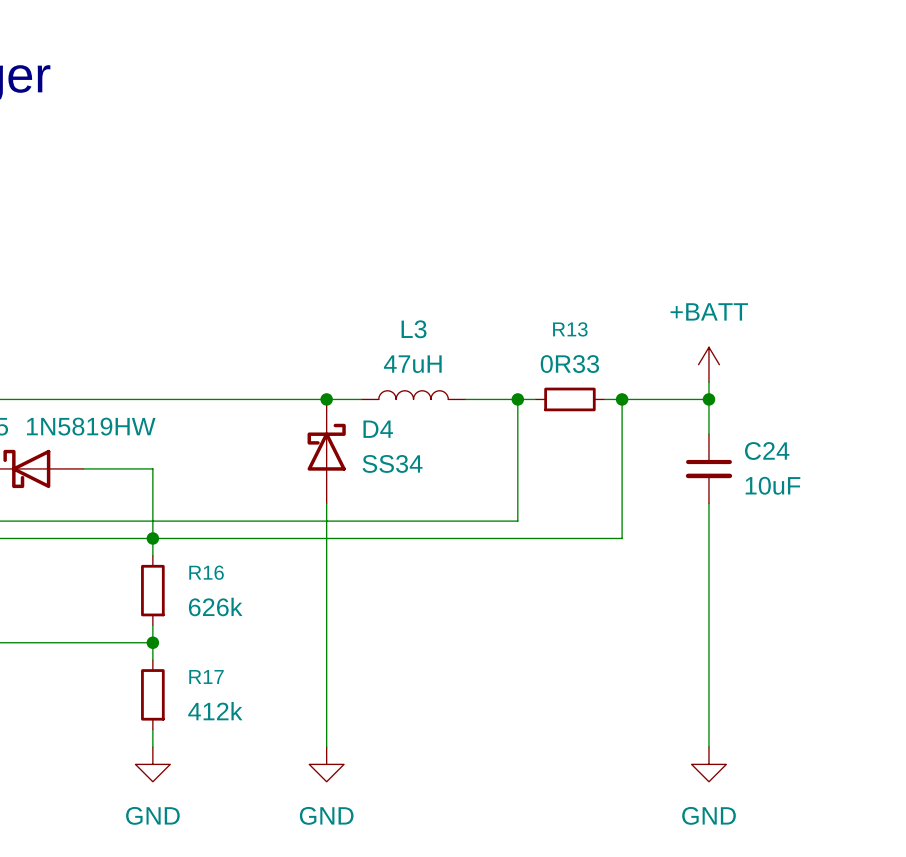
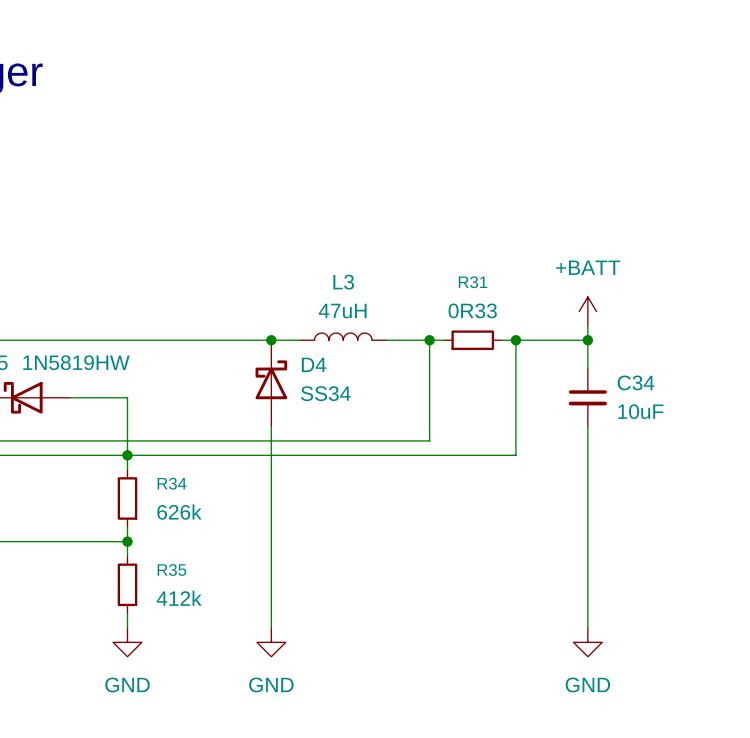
R13 name: R13 (570, 329) -> R31 (473, 282)
C24 name: C24 (767, 451) -> C34 (636, 382)
R16 name: R16 (206, 572) -> R34 (172, 483)
R17 name: R17 (206, 676) -> R35 (171, 569)

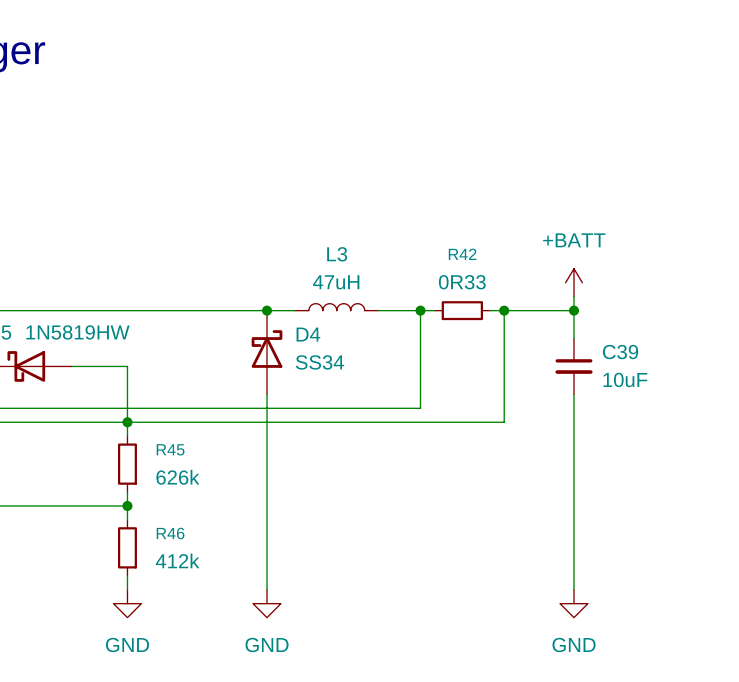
R31 name: R31 (473, 282) -> R42 (462, 254)
C34 name: C34 (636, 382) -> C39 (620, 352)
R34 name: R34 (172, 483) -> R45 (170, 449)
R35 name: R35 (171, 569) -> R46 (170, 533)

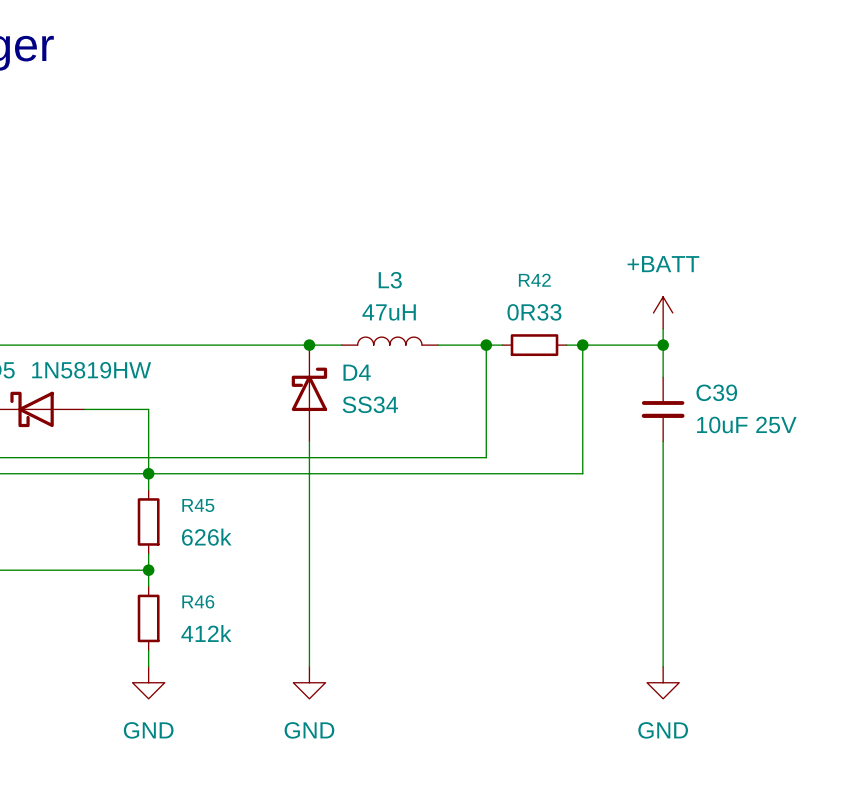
C39 value: 10uF (625, 379) -> 10uF 25V (746, 424)

